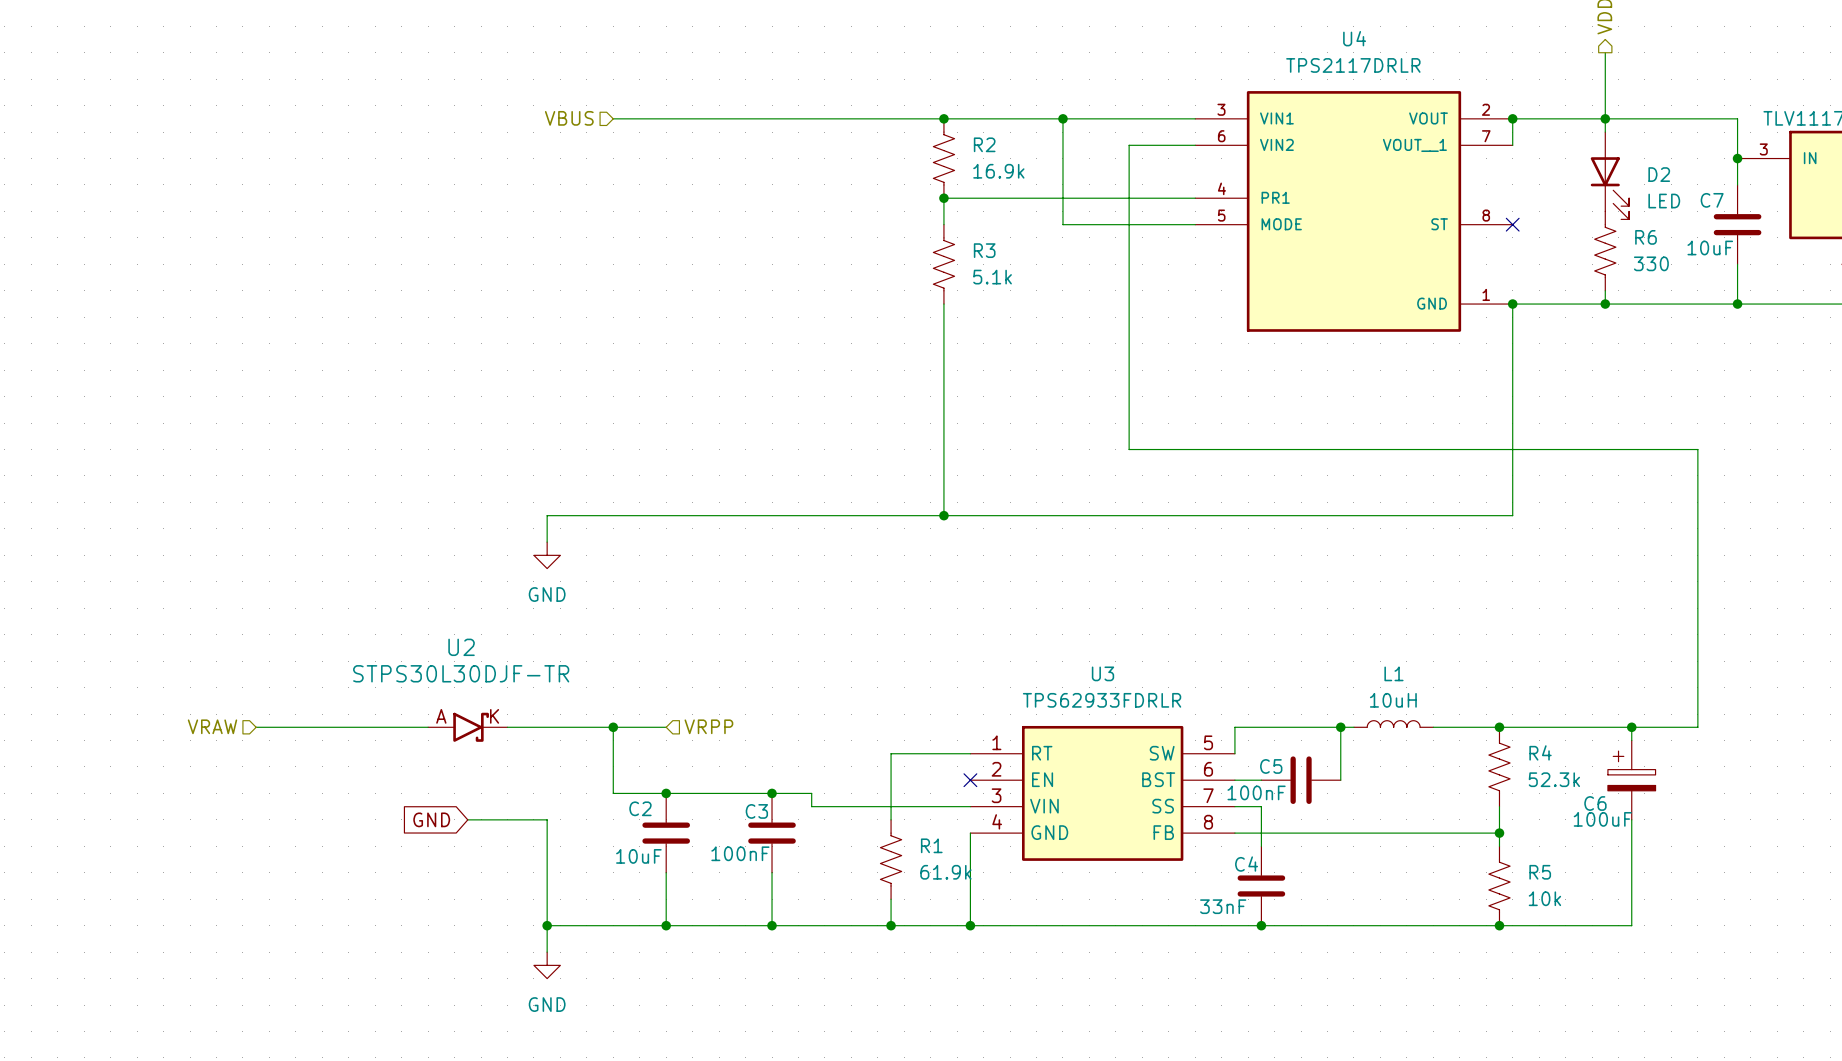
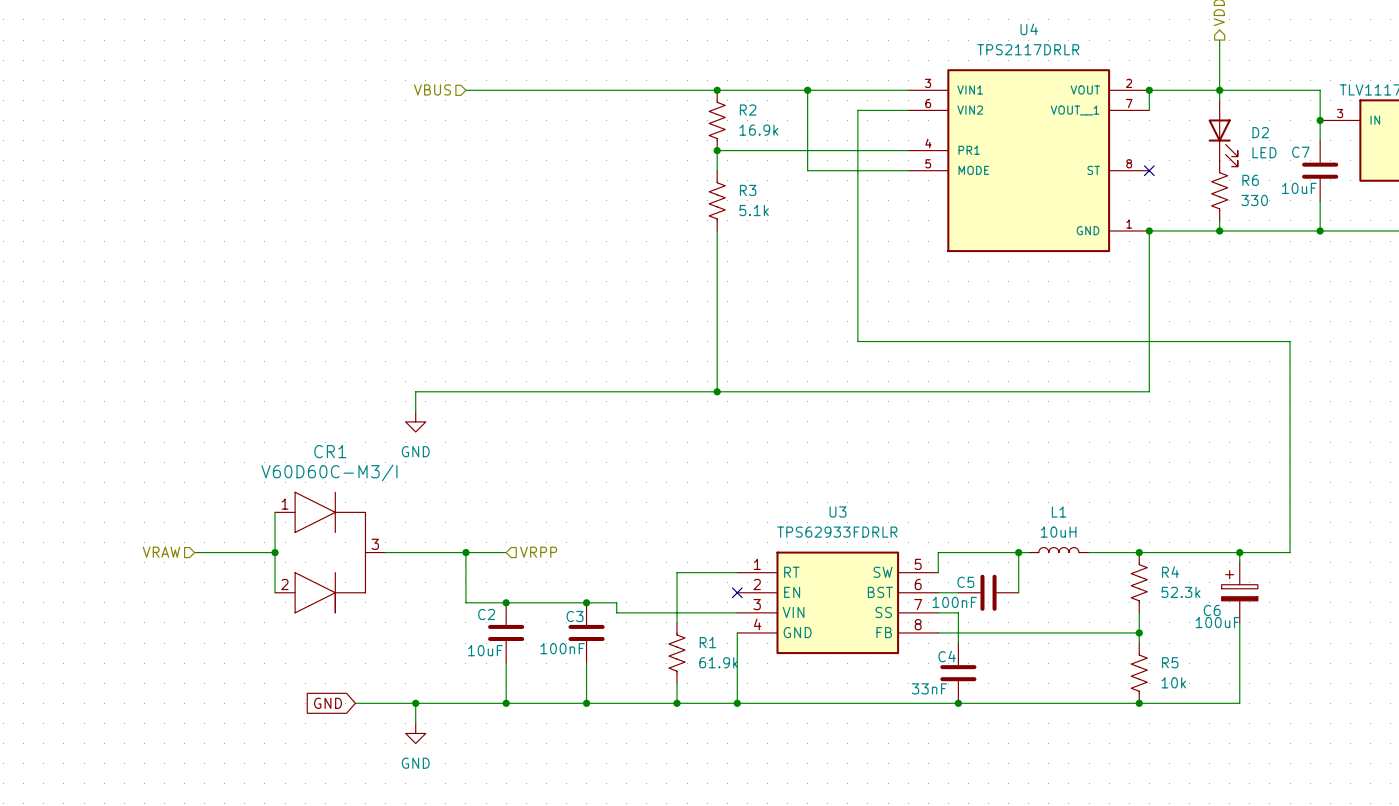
wire: none -> (275, 512) (275, 592)
U2: STPS30L30DJF-TR (467, 721) -> none
wire: (361, 727) (428, 727) -> none
junction: none -> (275, 552)
CR1: none -> V60D60C-M3/I (330, 552)
global label position: GND (431, 819) -> GND (328, 703)
wire: (467, 819) (547, 819) (547, 925) -> (355, 703) (415, 703)

